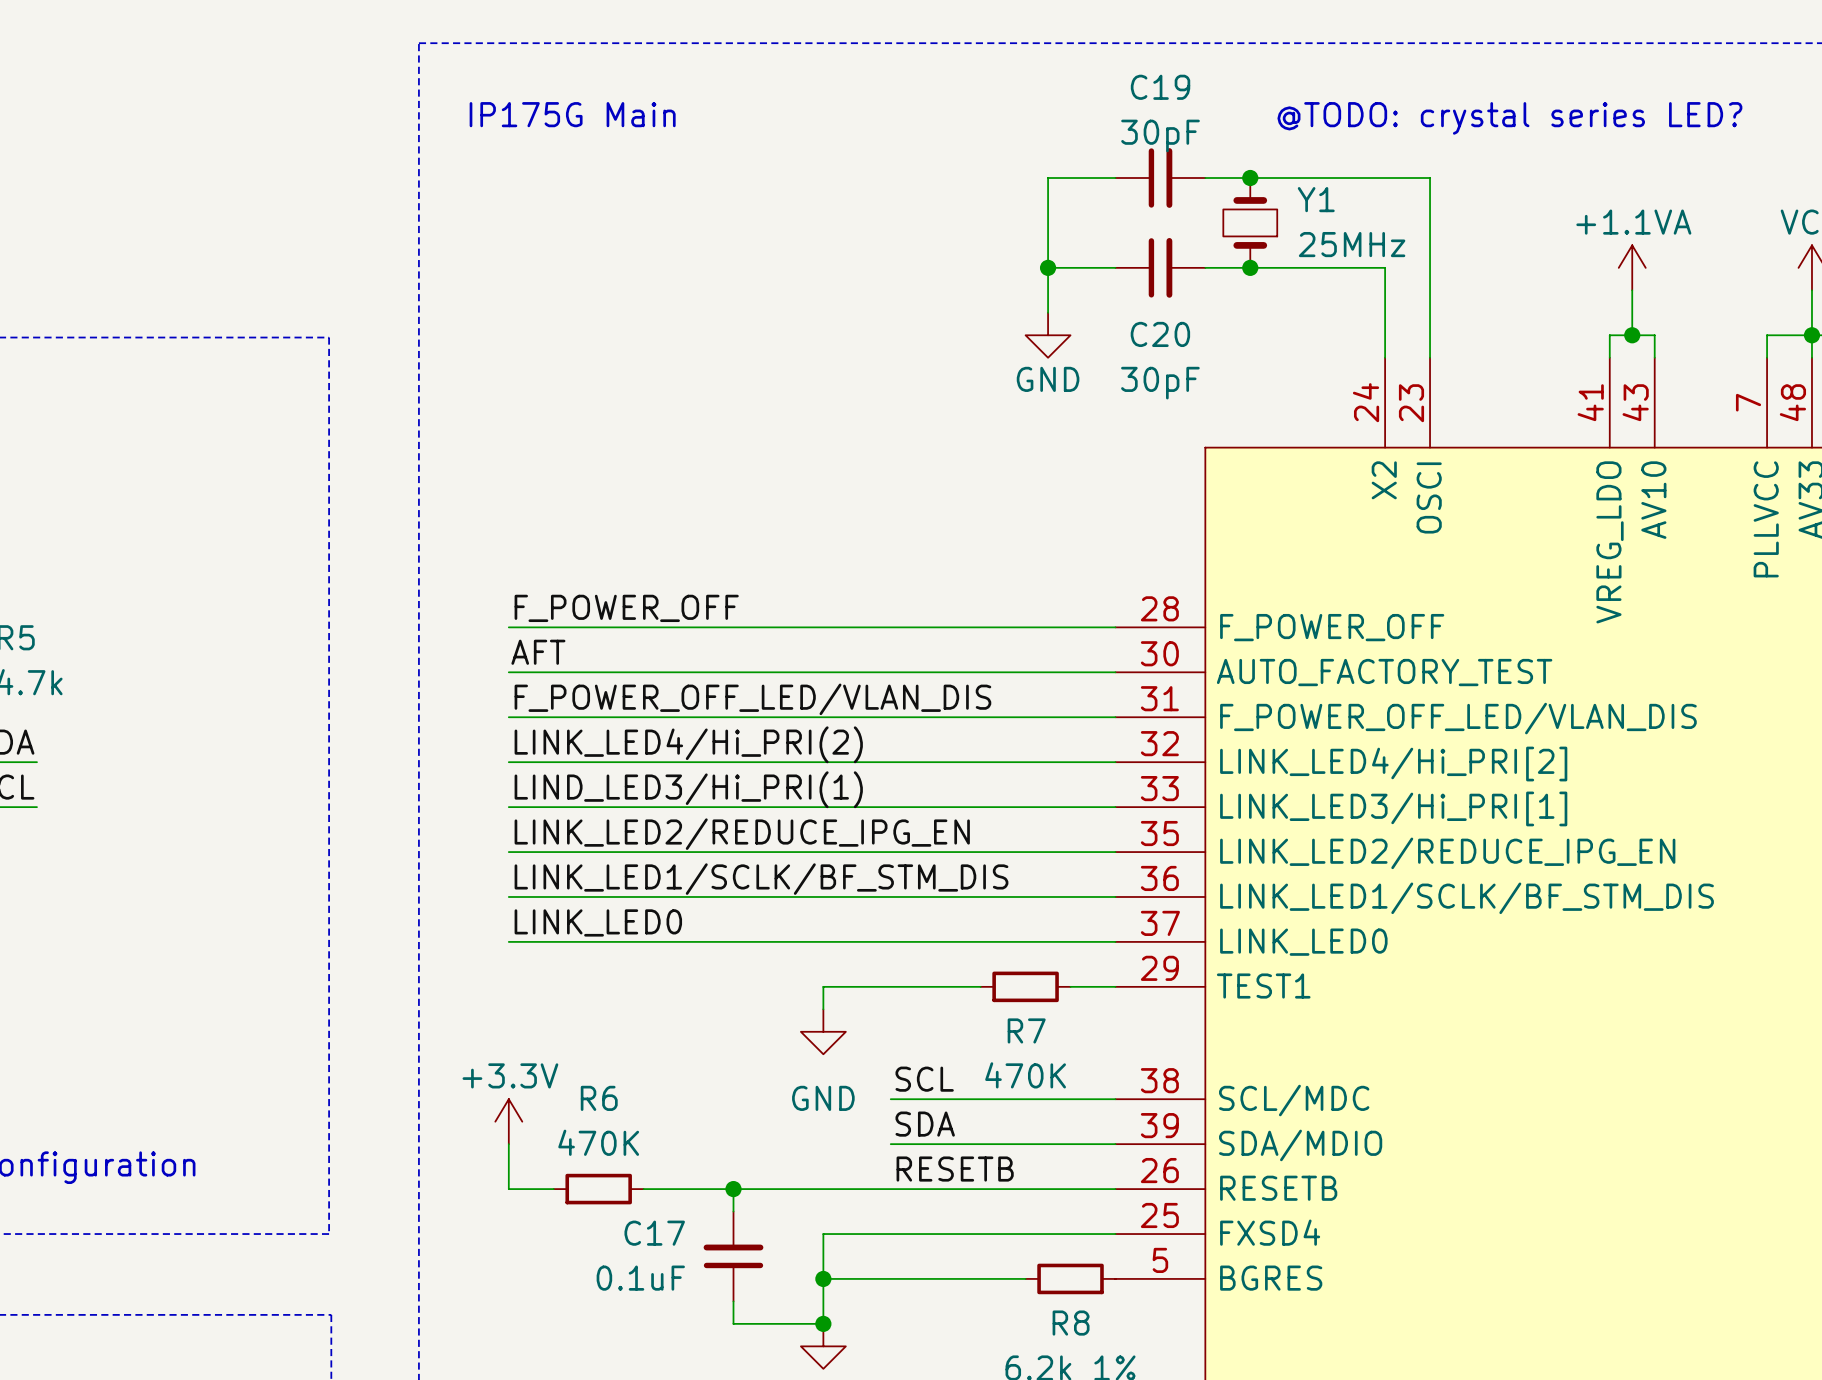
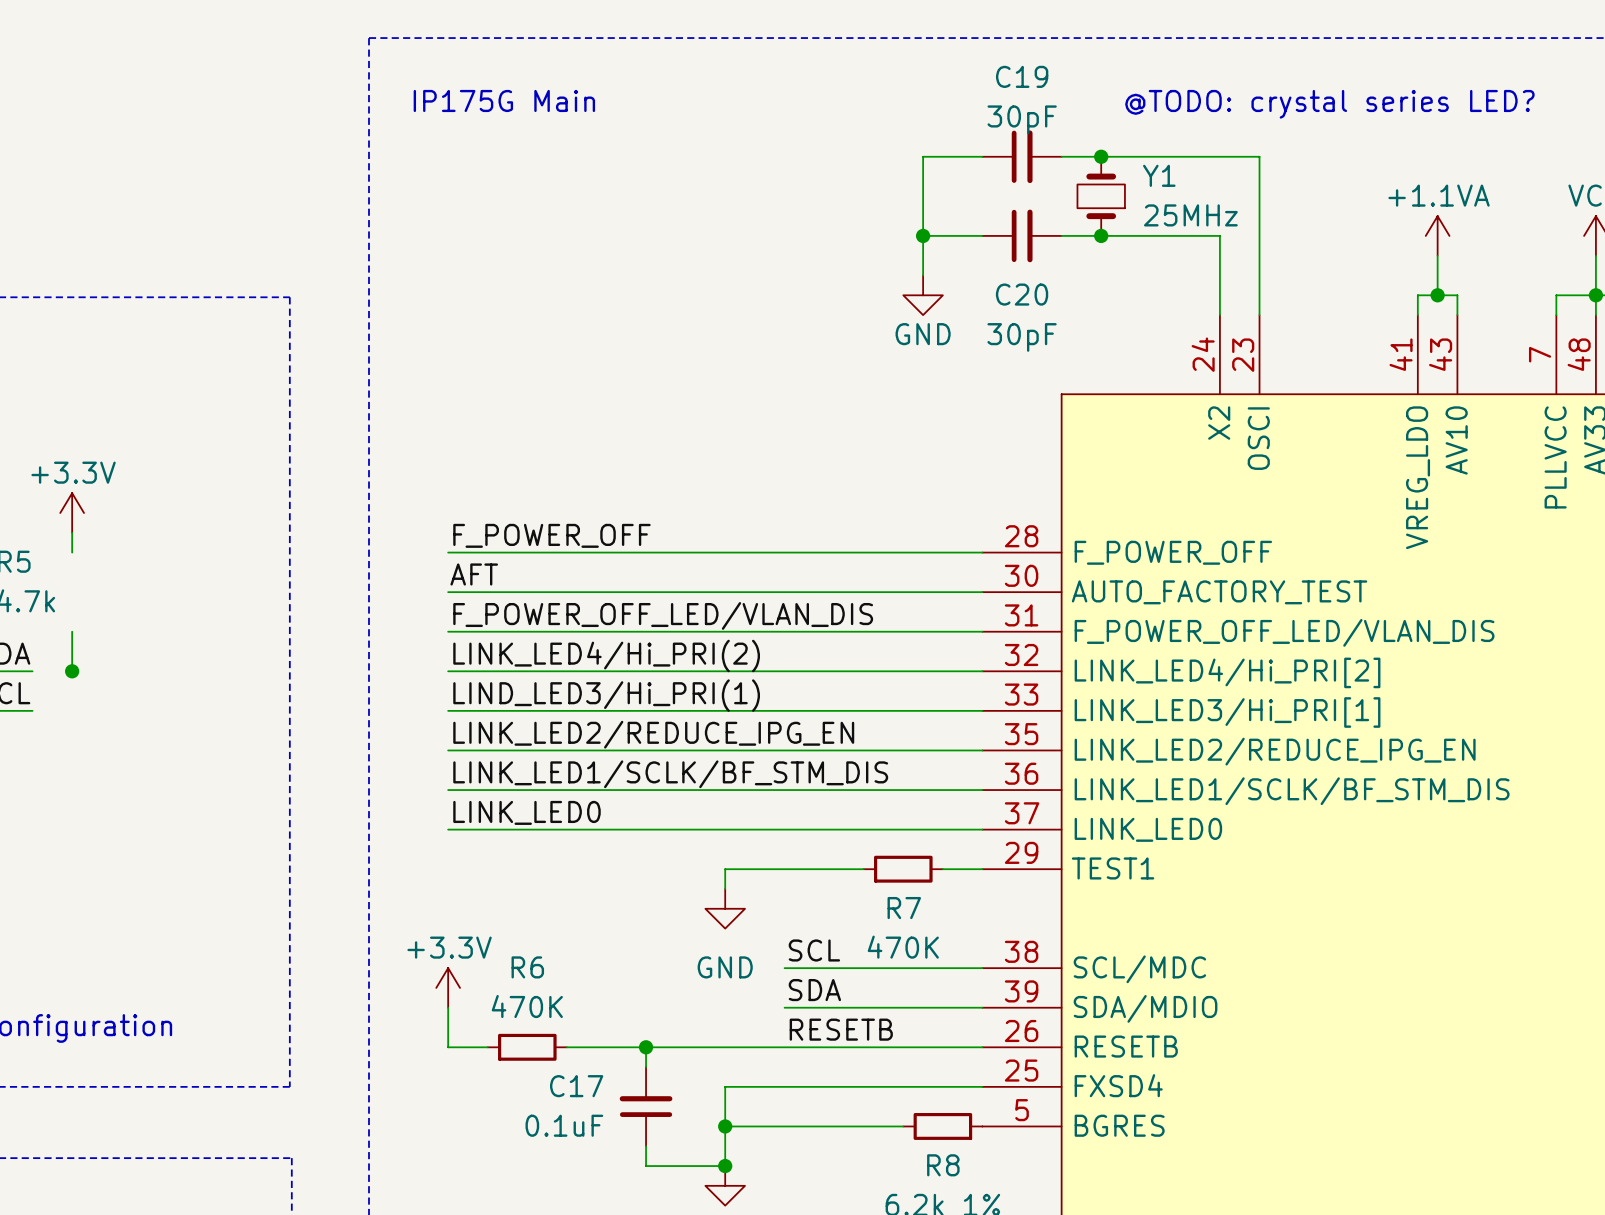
power symbol: none -> +3.3V (72, 512)
wire: none -> (72, 532) (72, 552)
wire: none -> (72, 631) (72, 671)
junction: none -> (72, 671)

